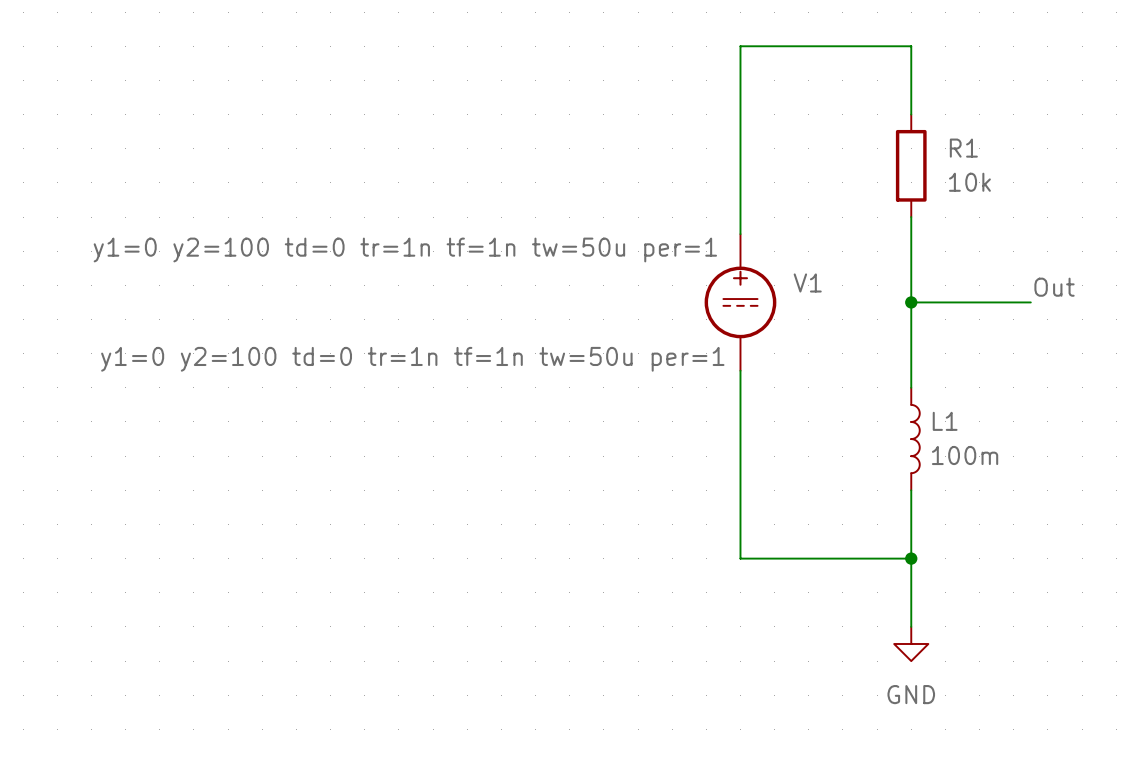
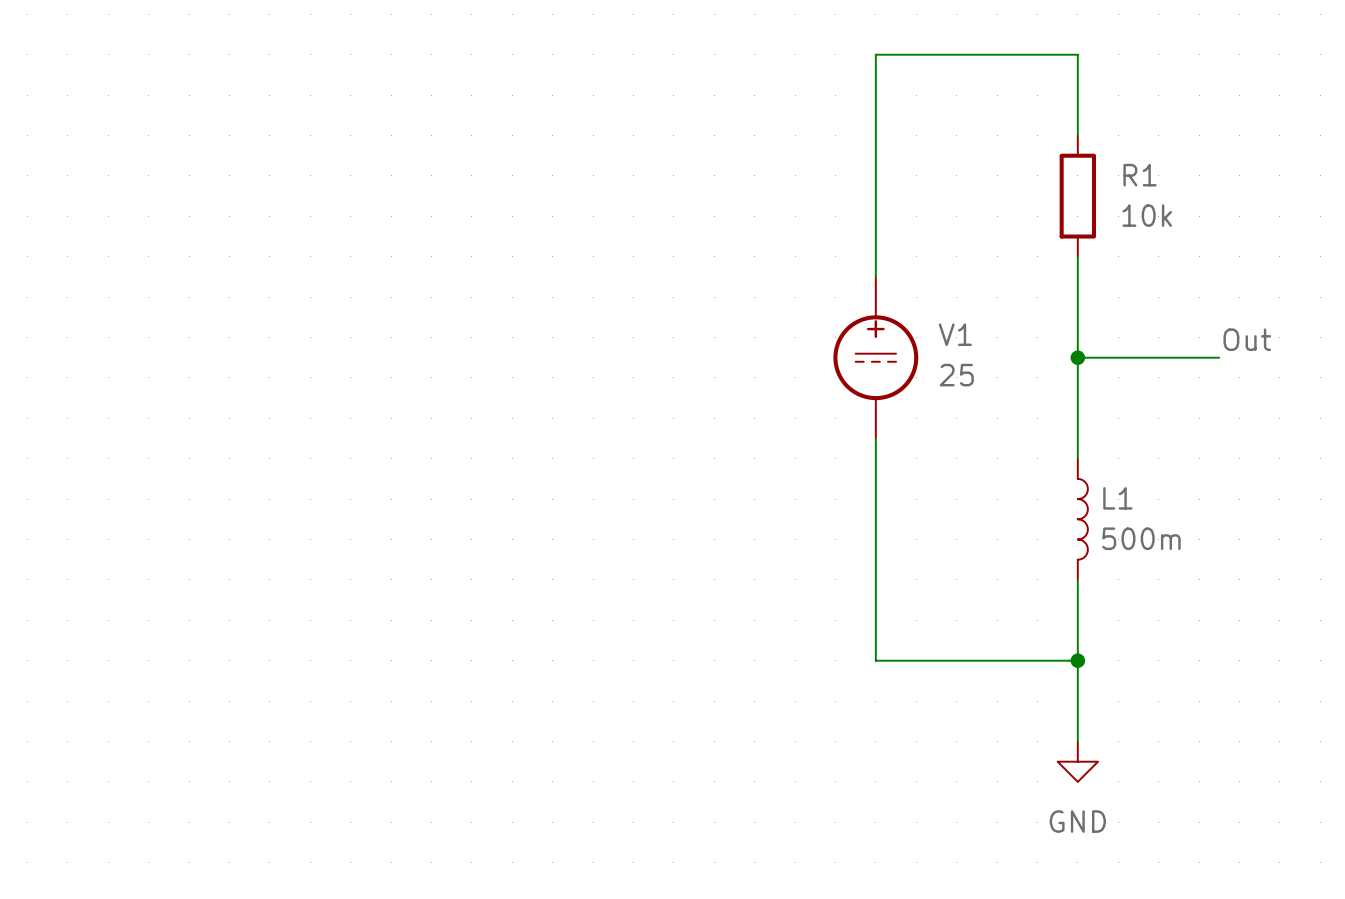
V1 text: y1=0 y2=100 td=0 tr=1n tf=1n tw=50u per=1 (405, 249) -> none
V1 value: y1=0 y2=100 td=0 tr=1n tf=1n tw=50u per=1 (412, 359) -> 25 (956, 375)
L1 value: 100m (965, 455) -> 500m (1141, 538)

